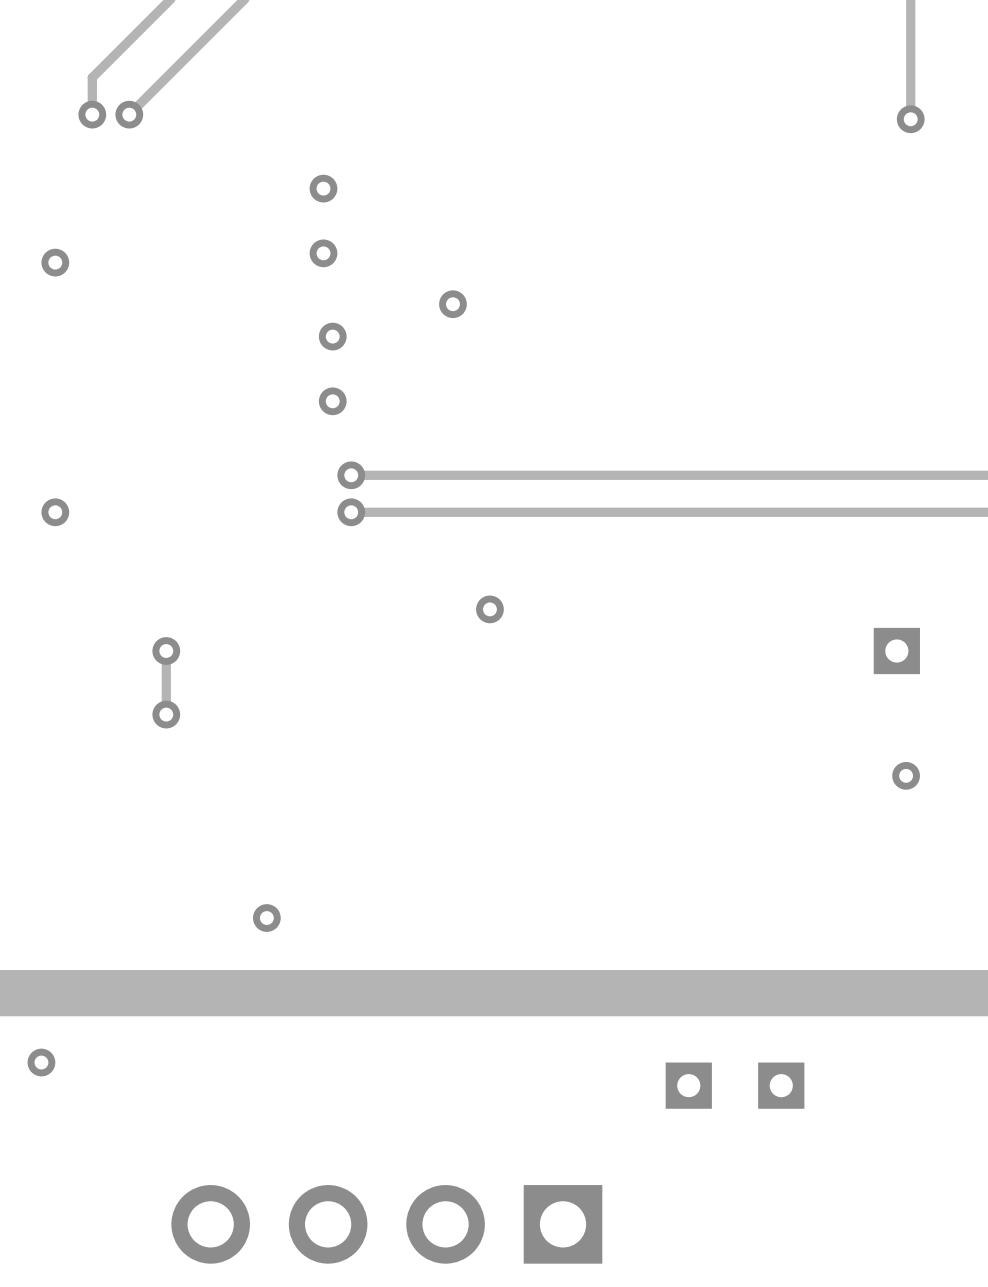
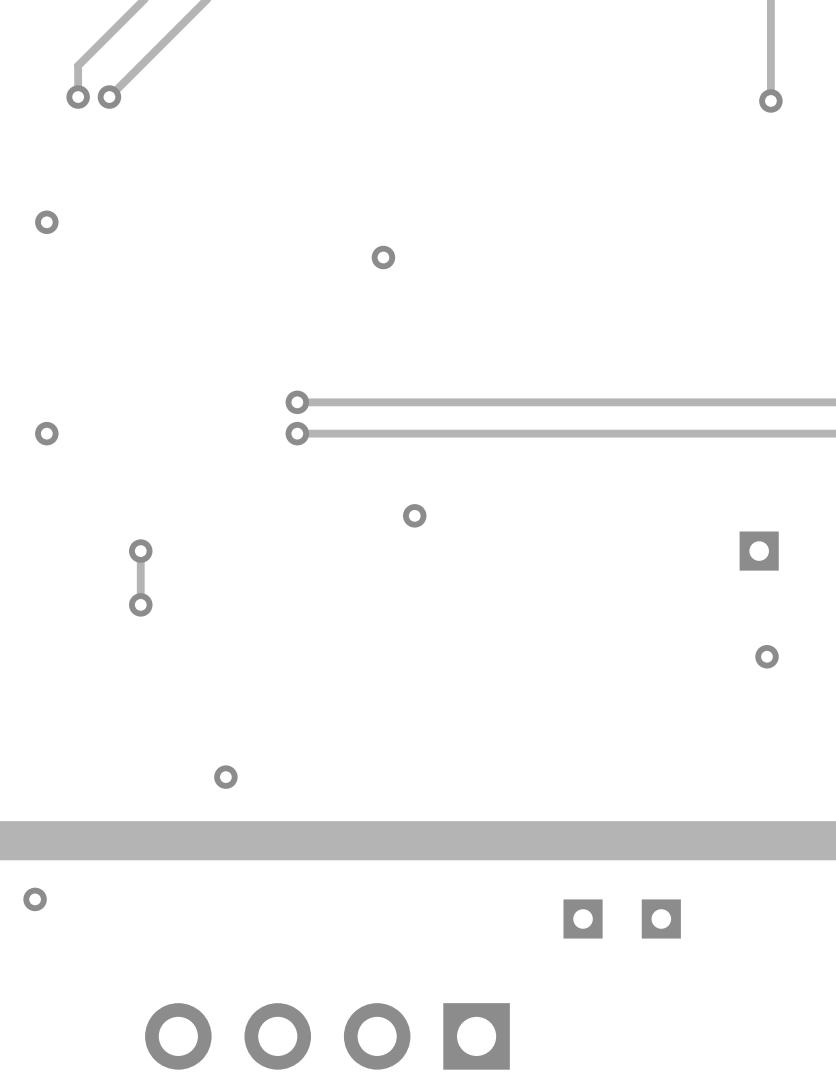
via: (323, 188) -> none
via: (323, 253) -> none
via: (332, 336) -> none
via: (332, 401) -> none

